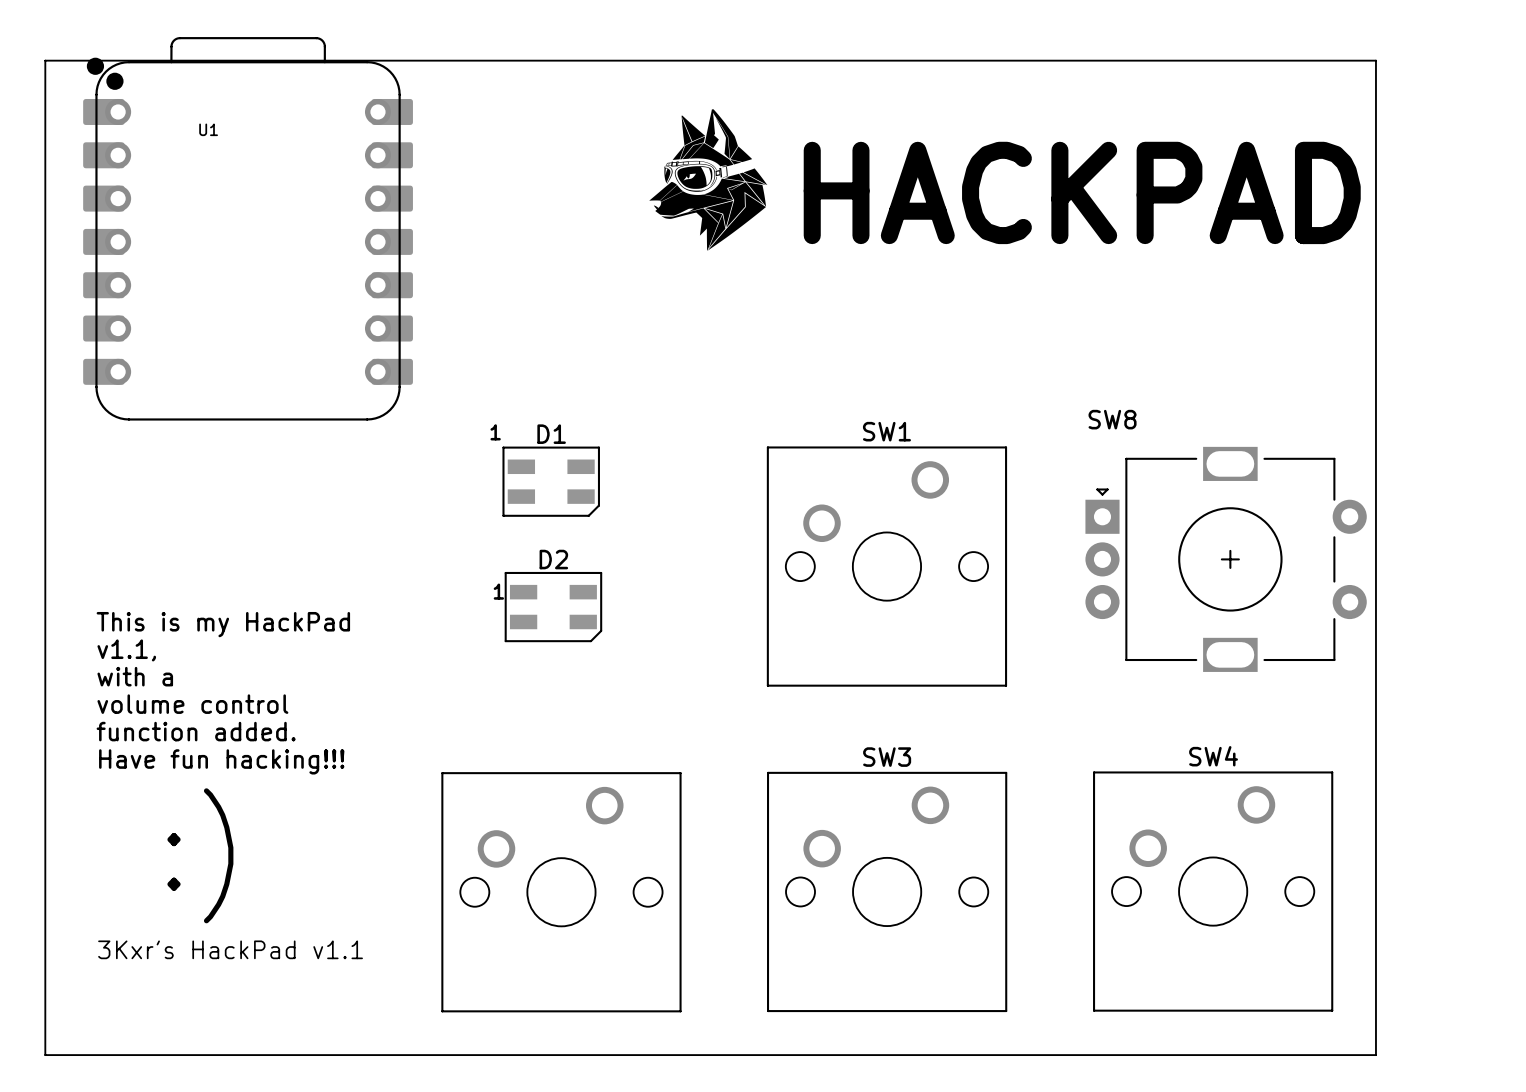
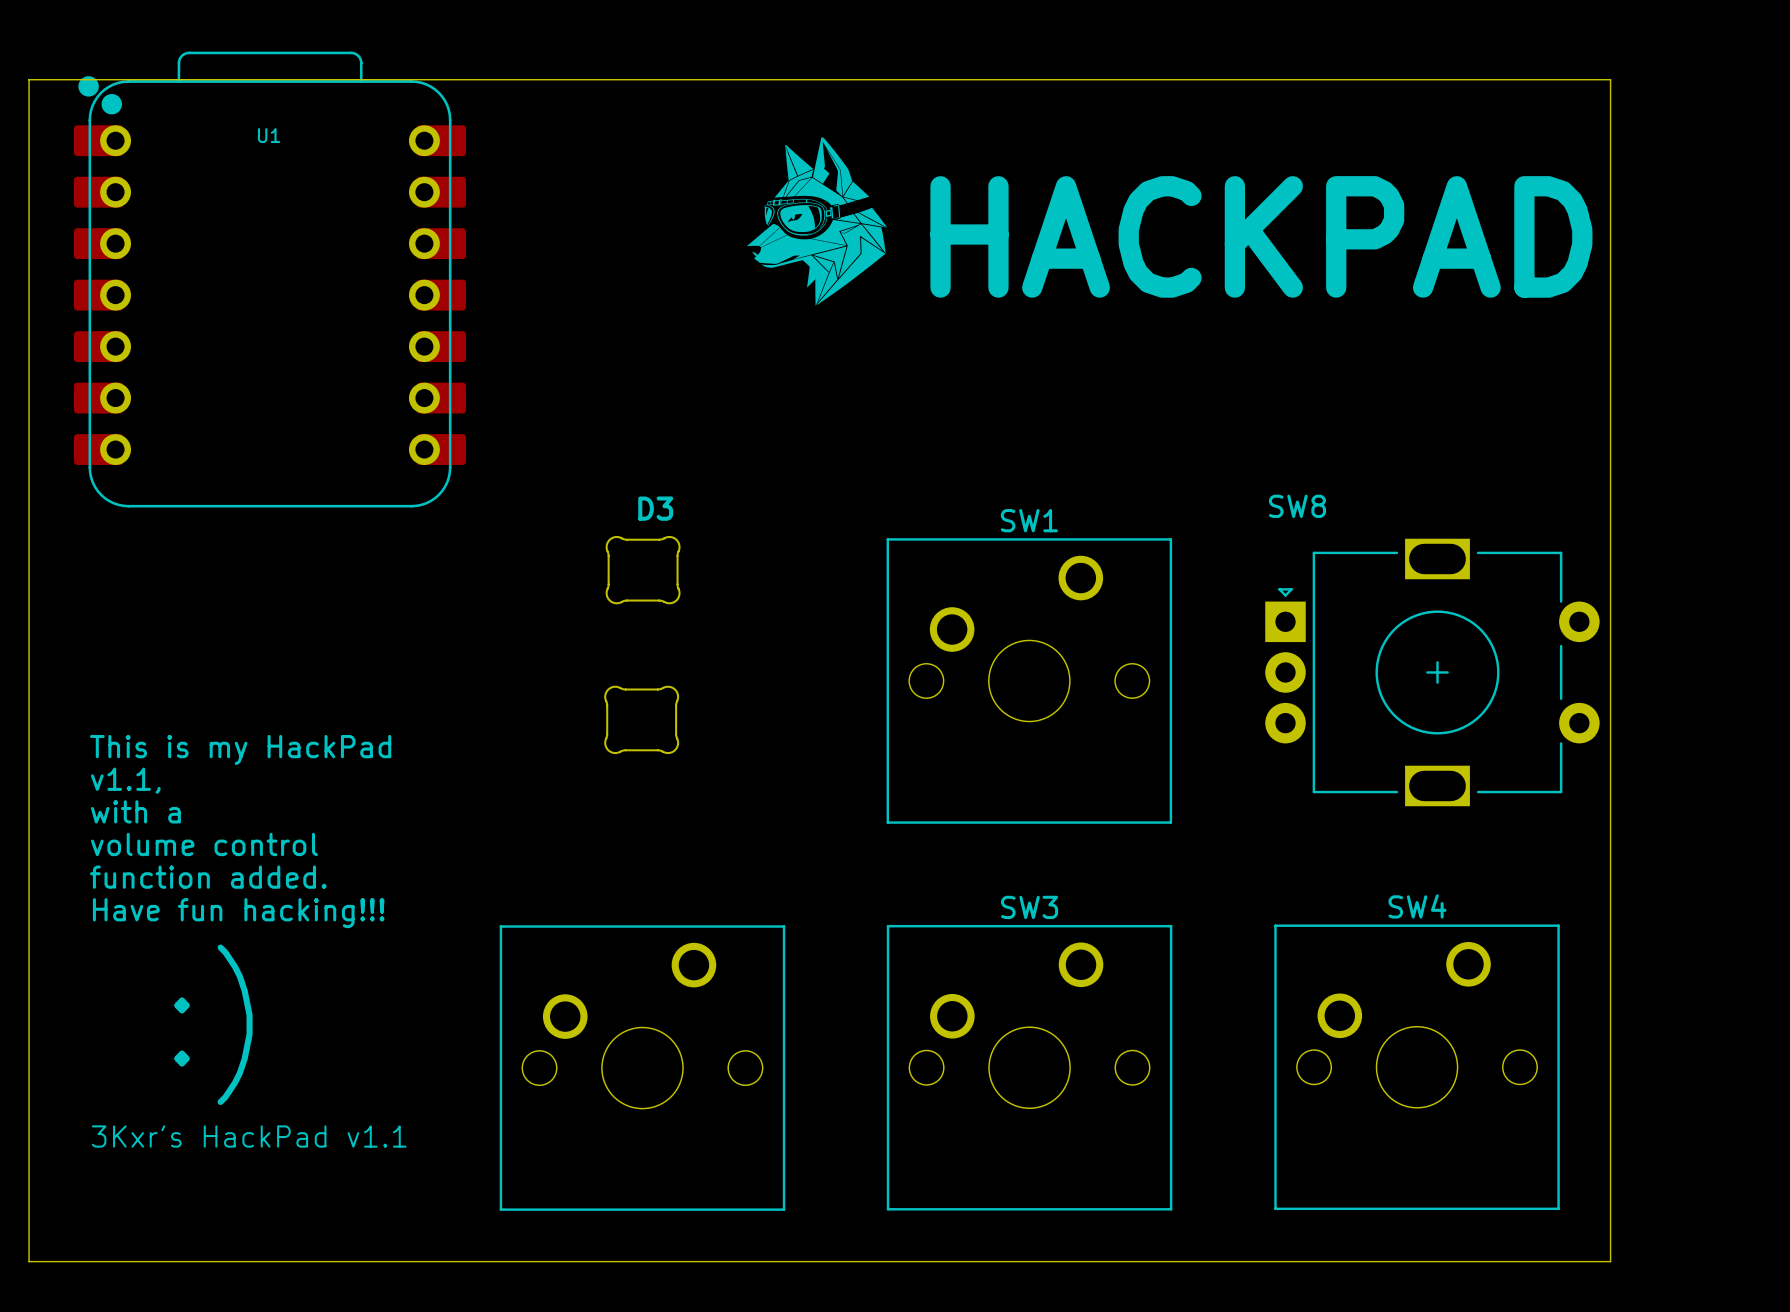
U1 name position: U1 (208, 129) -> U1 (269, 135)
D3: none -> (643, 570)
D1: (551, 481) -> none
part: none -> (641, 719)
D2: (553, 607) -> none

